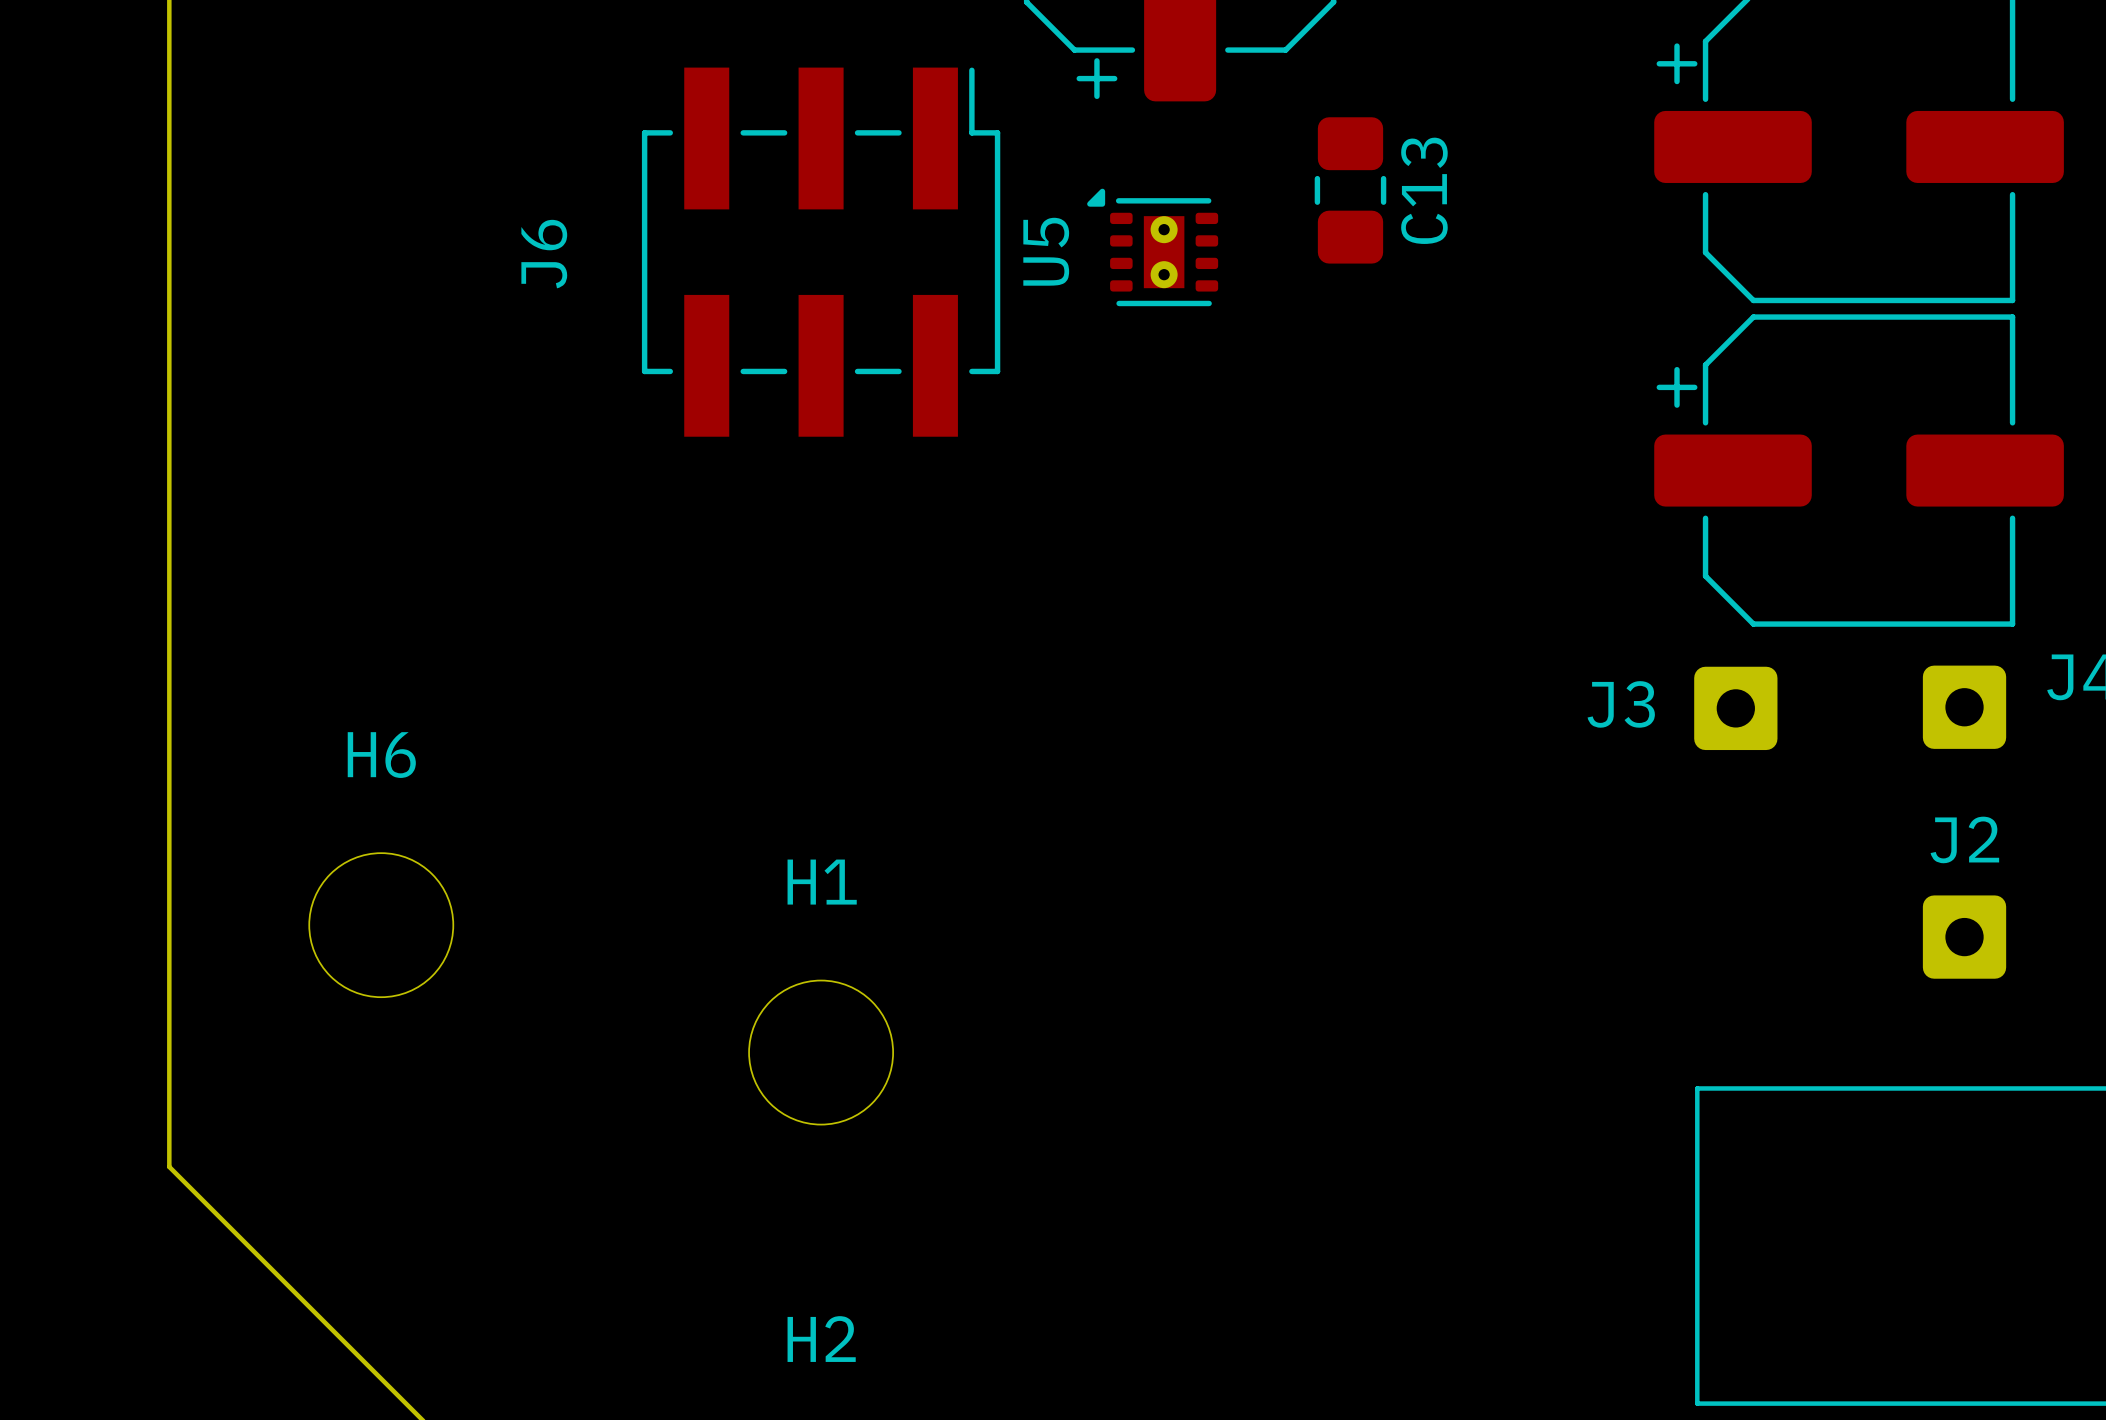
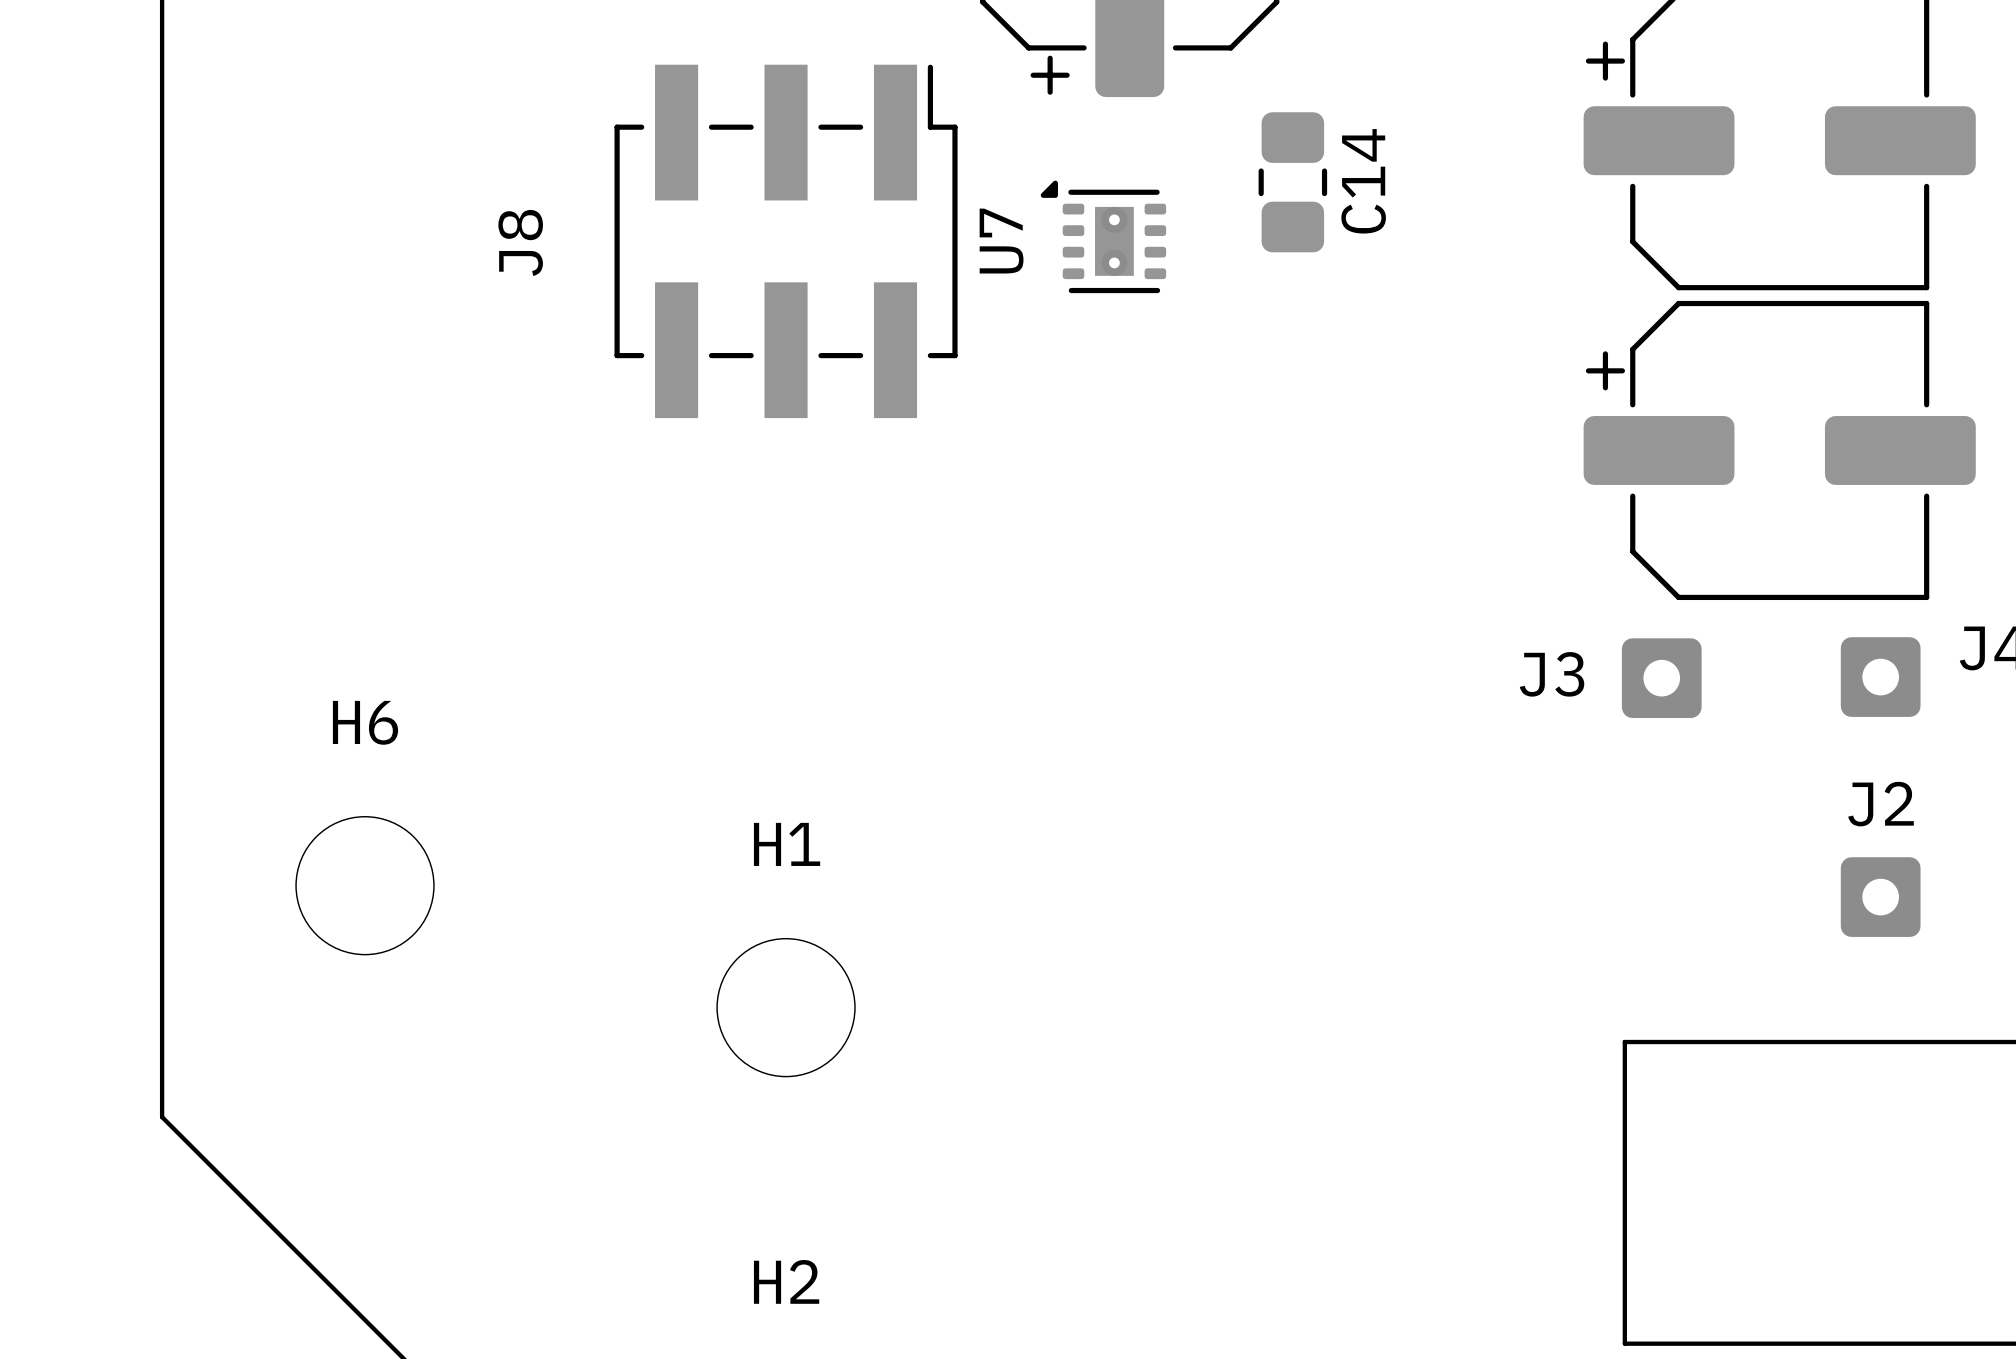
C13 name: C13 (1424, 190) -> C14 (1363, 181)
U5 name: U5 (1046, 251) -> U7 (1001, 241)
J6 name: J6 (544, 254) -> J8 (520, 242)

